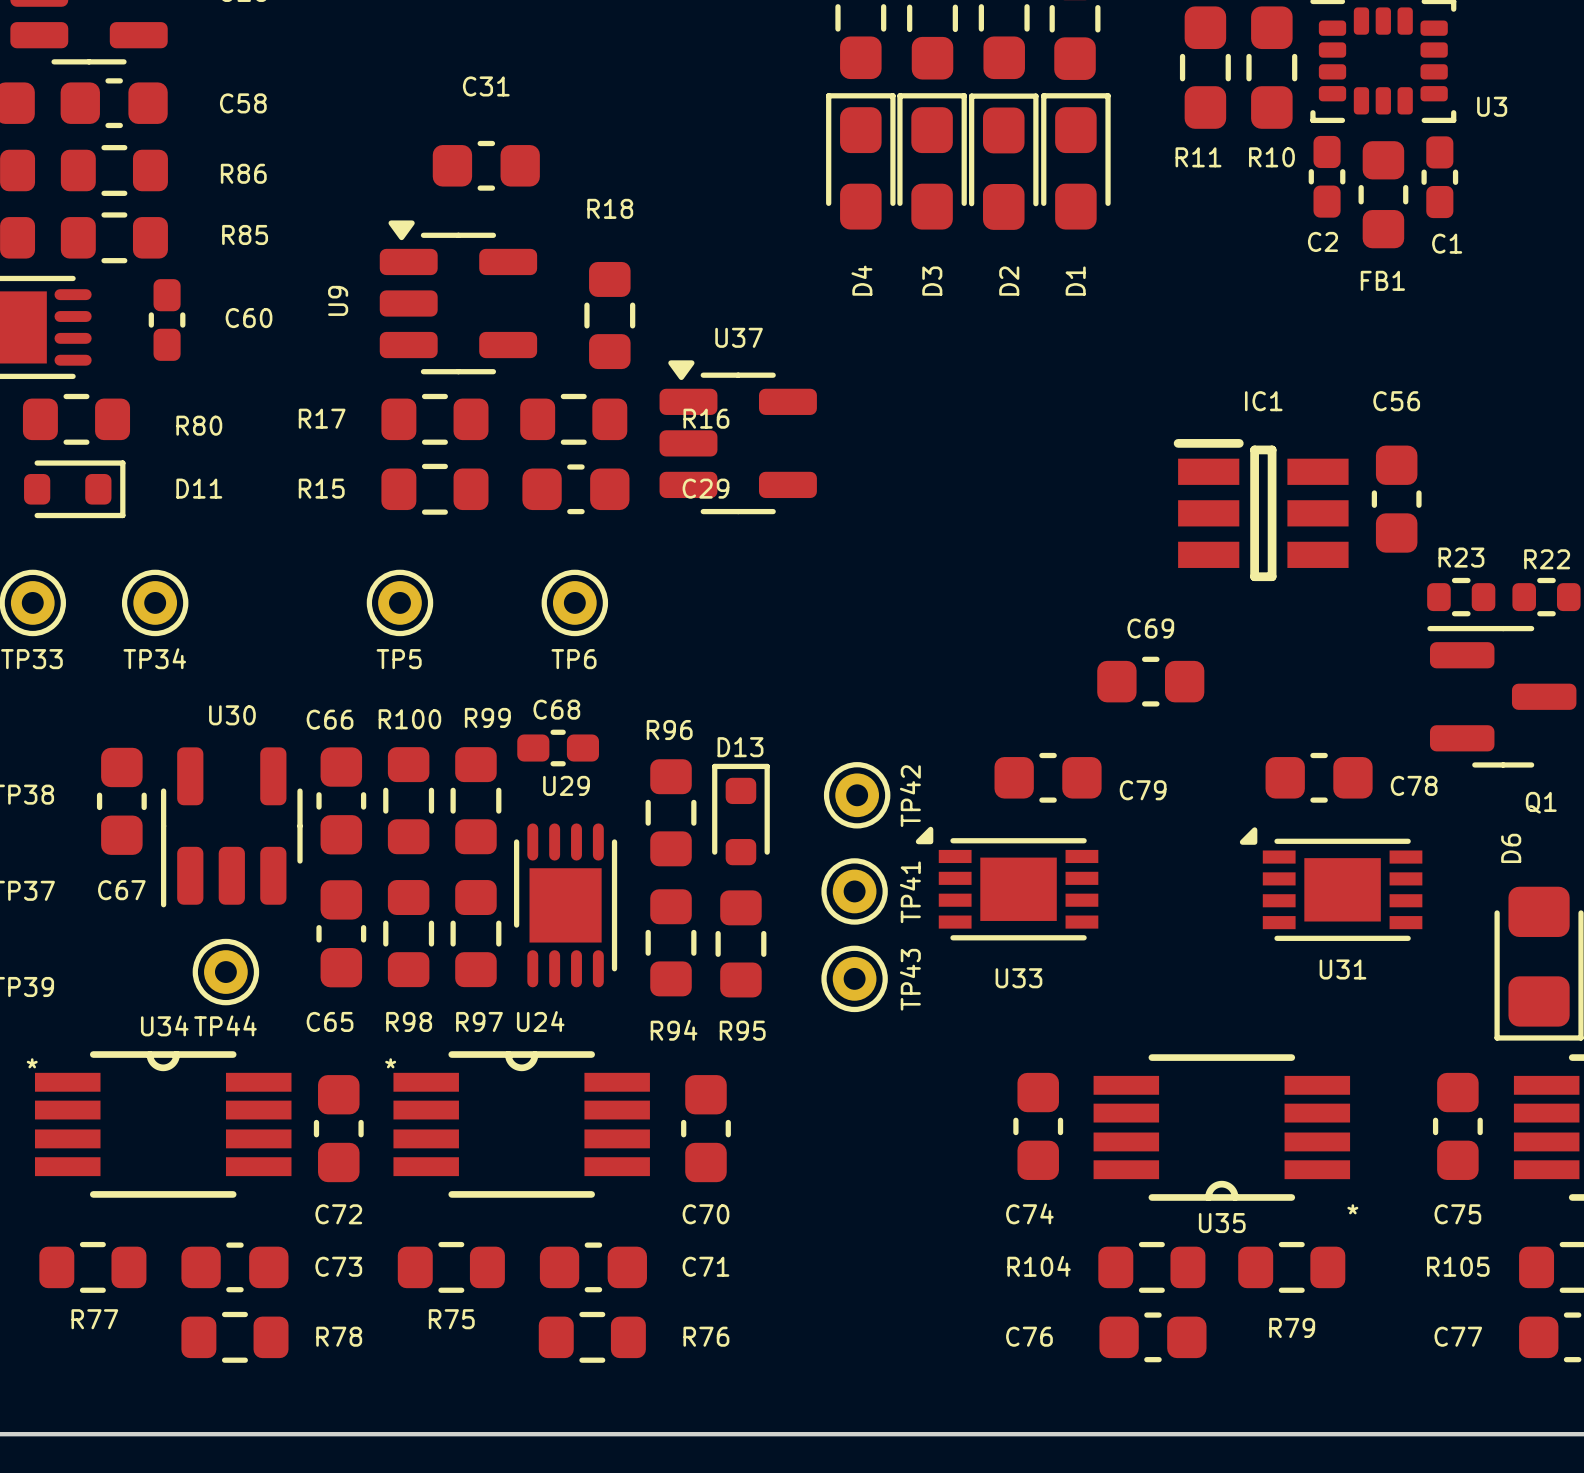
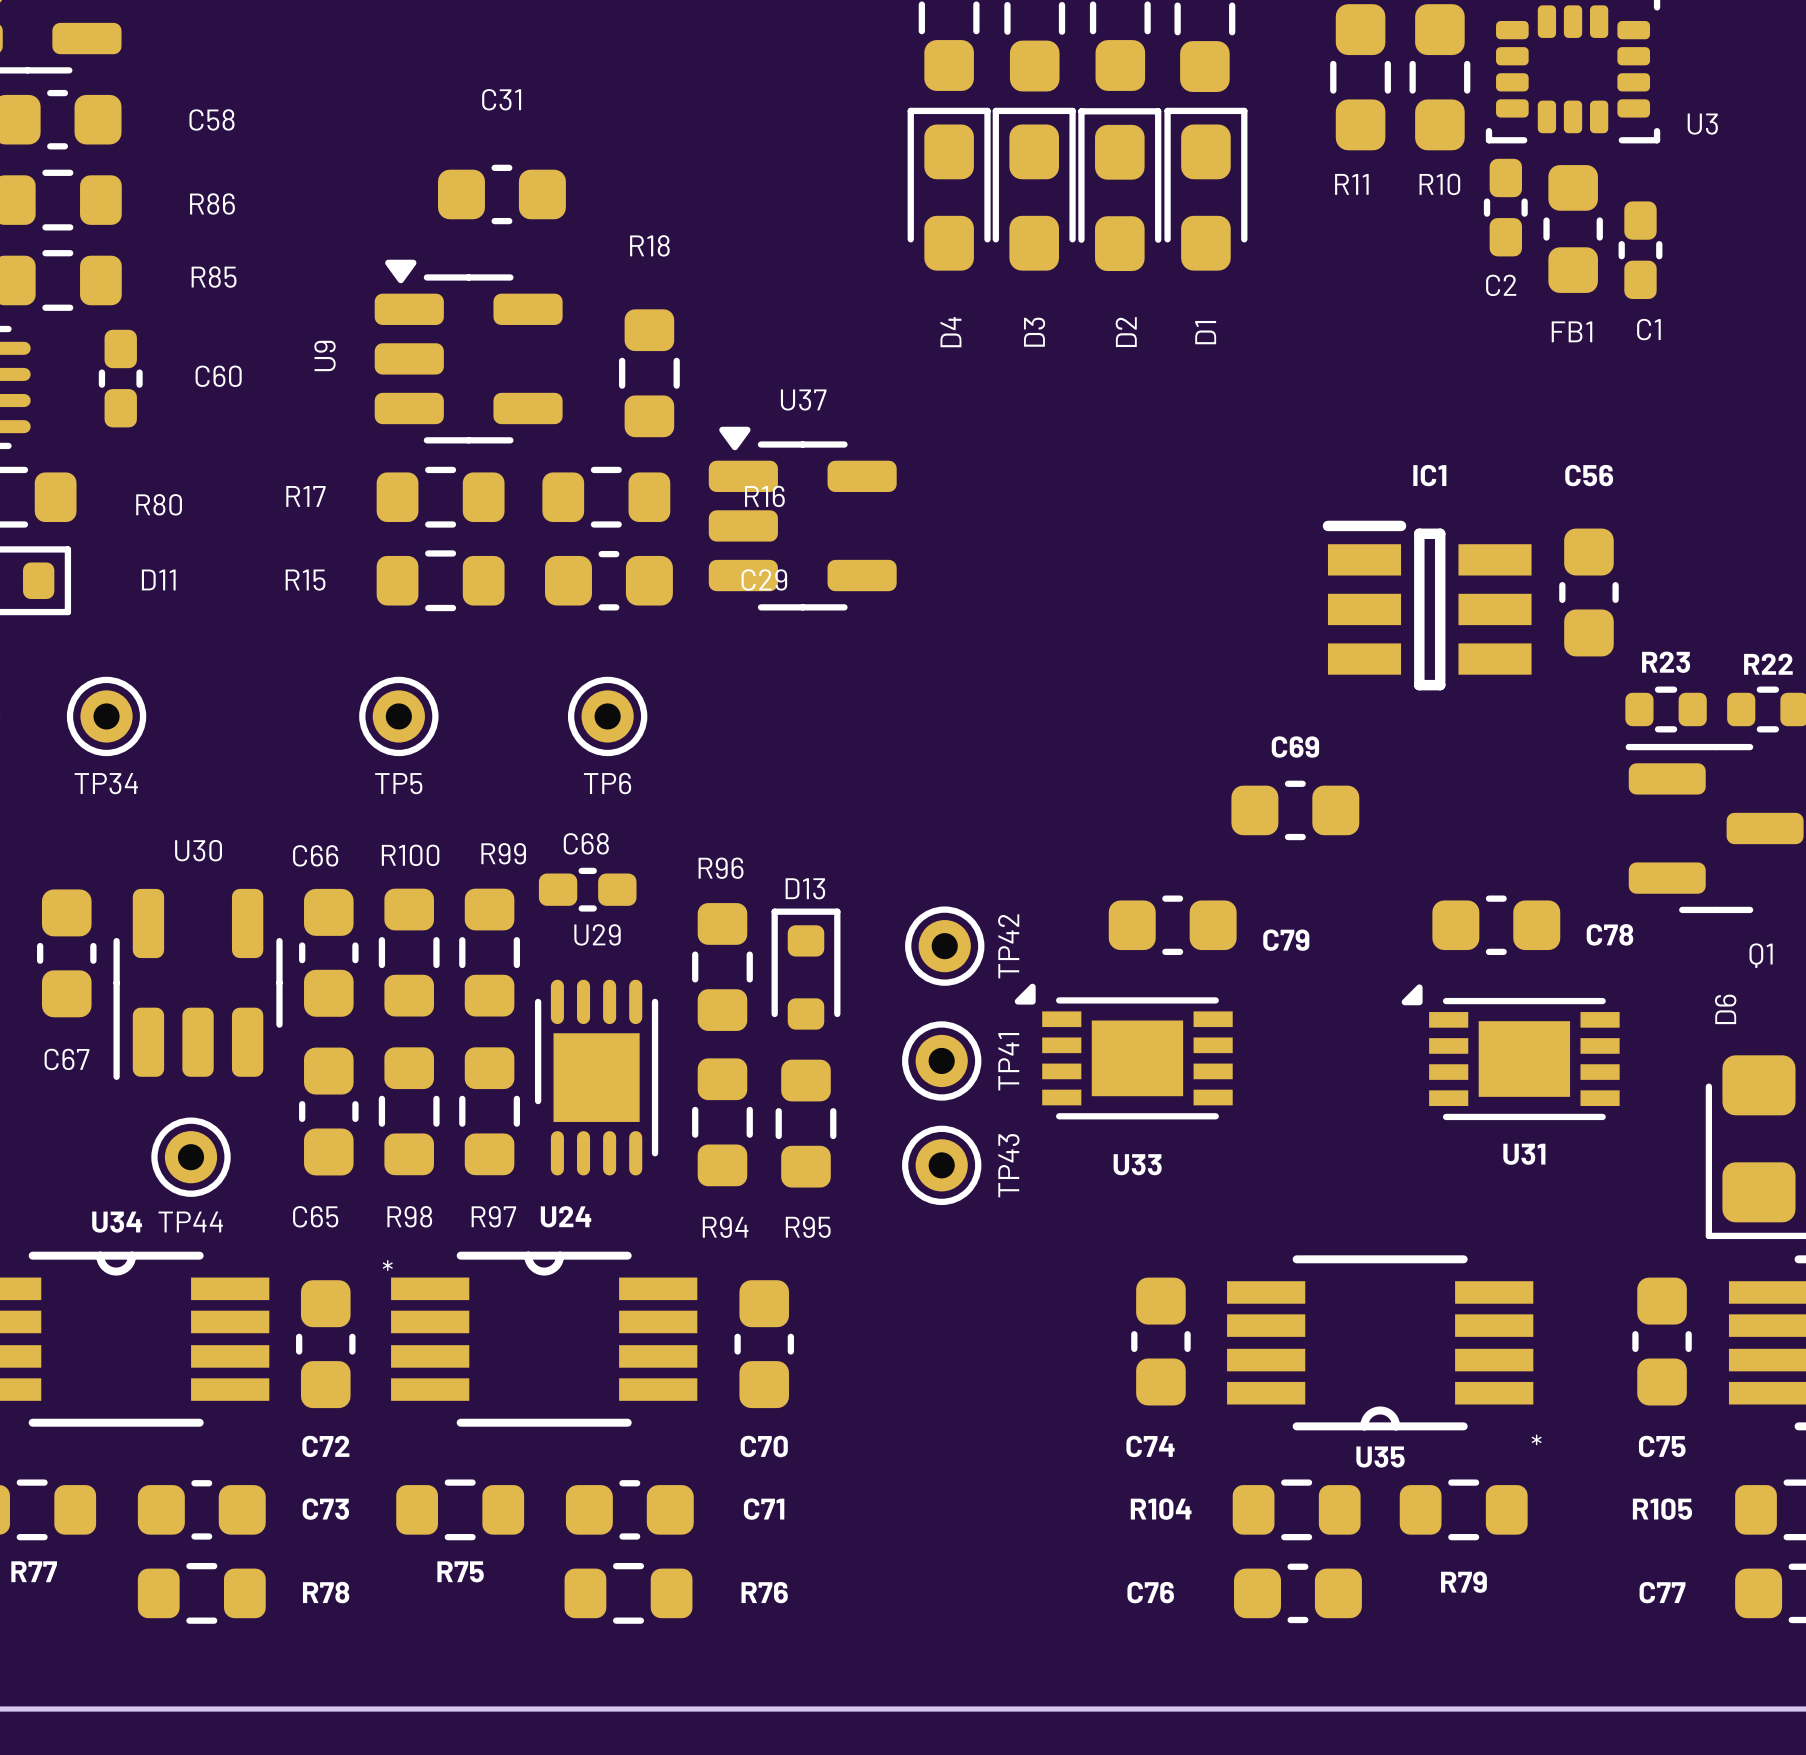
C1 position: (1439, 177) -> (1640, 250)

